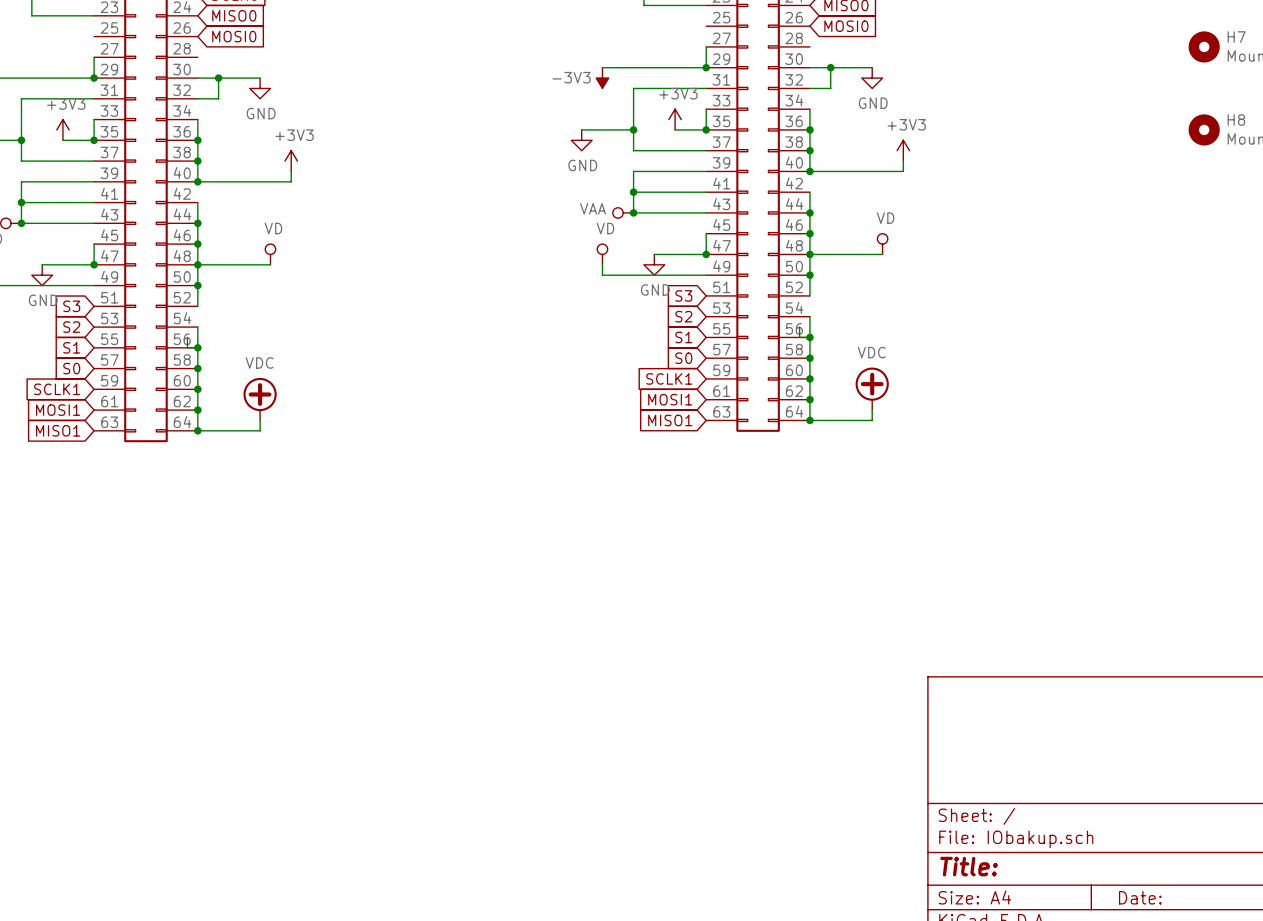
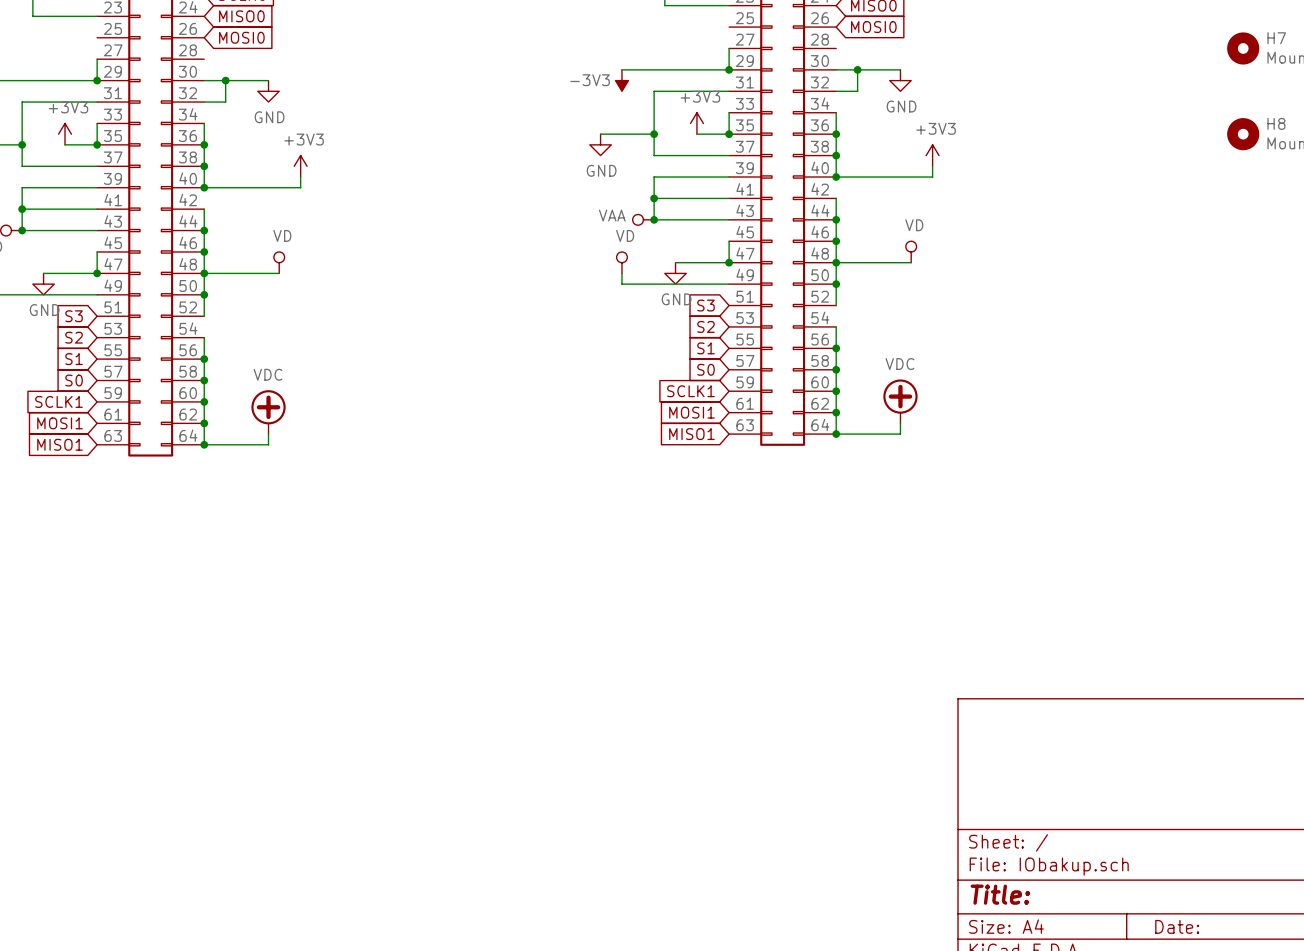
wire: (799, 327) (799, 337) (809, 337) -> none
wire: (187, 337) (187, 347) (197, 347) -> none

